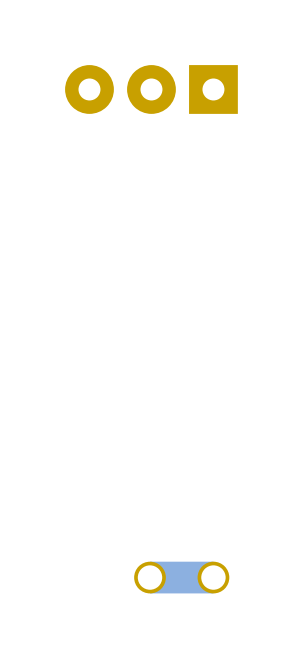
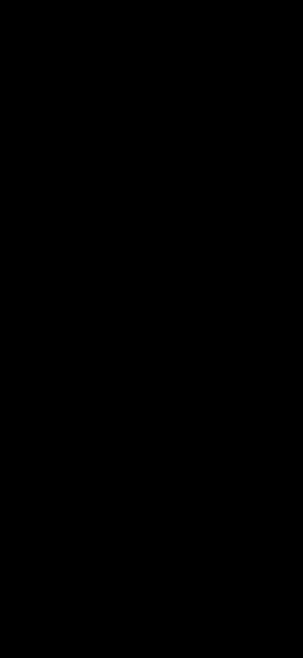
part: (151, 89) -> none
part: (181, 577) -> none

